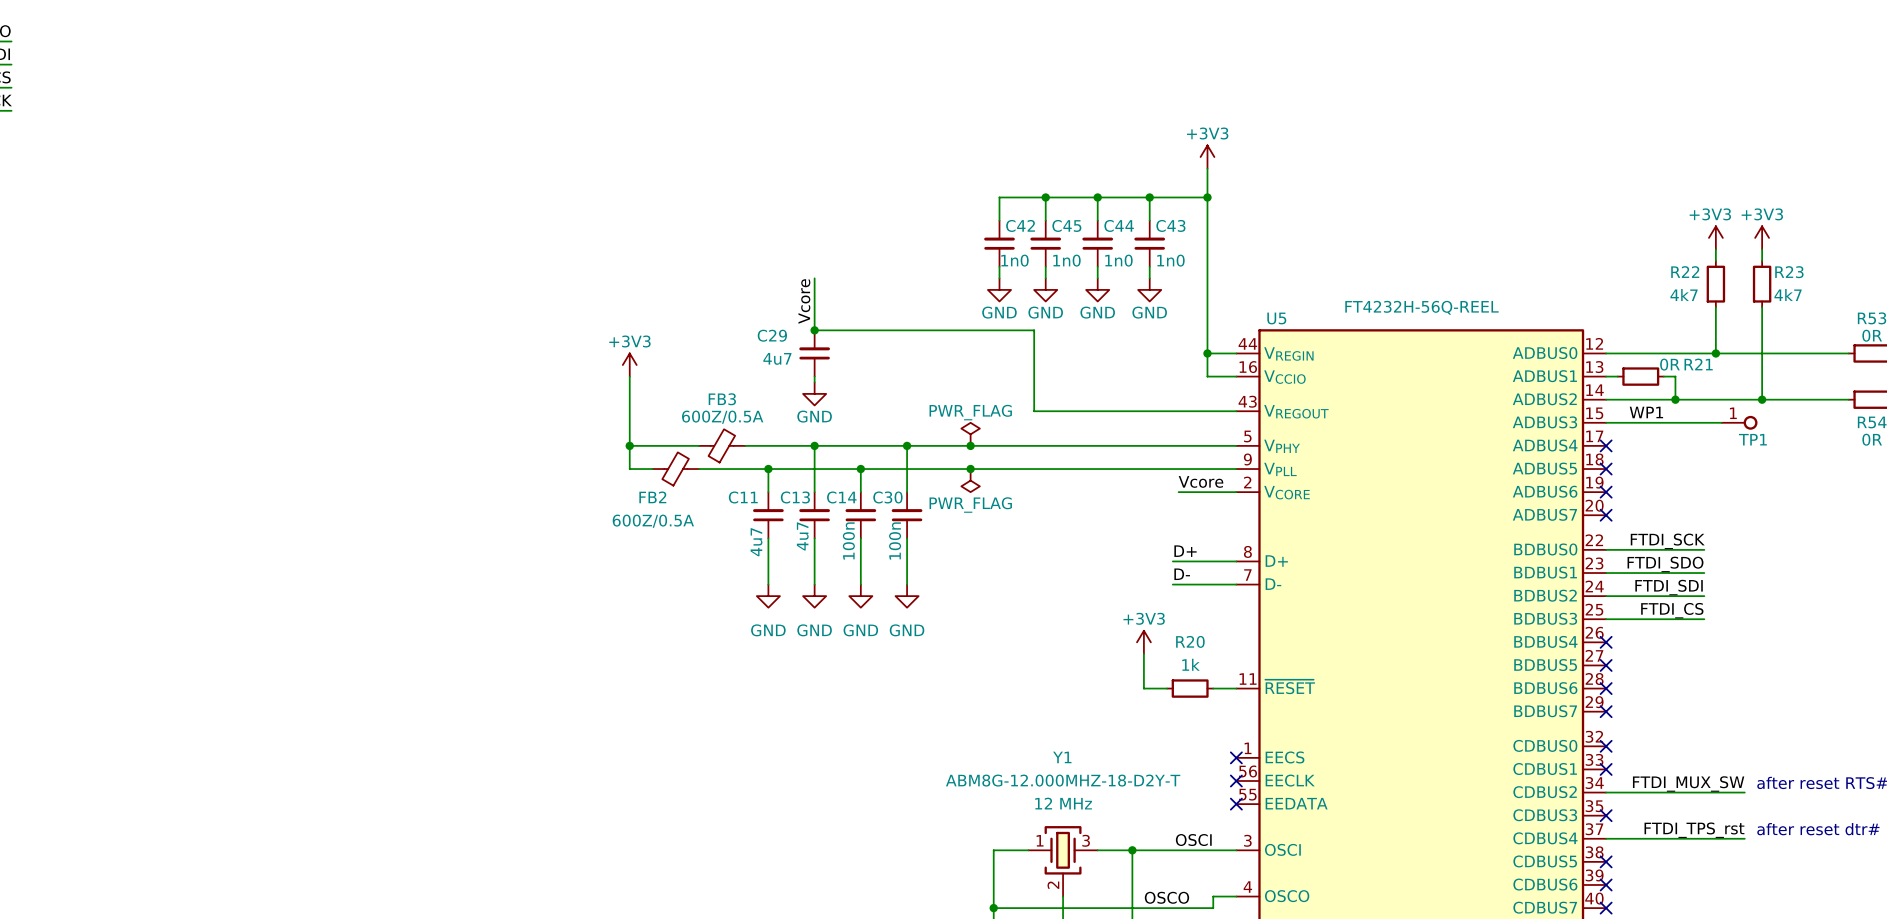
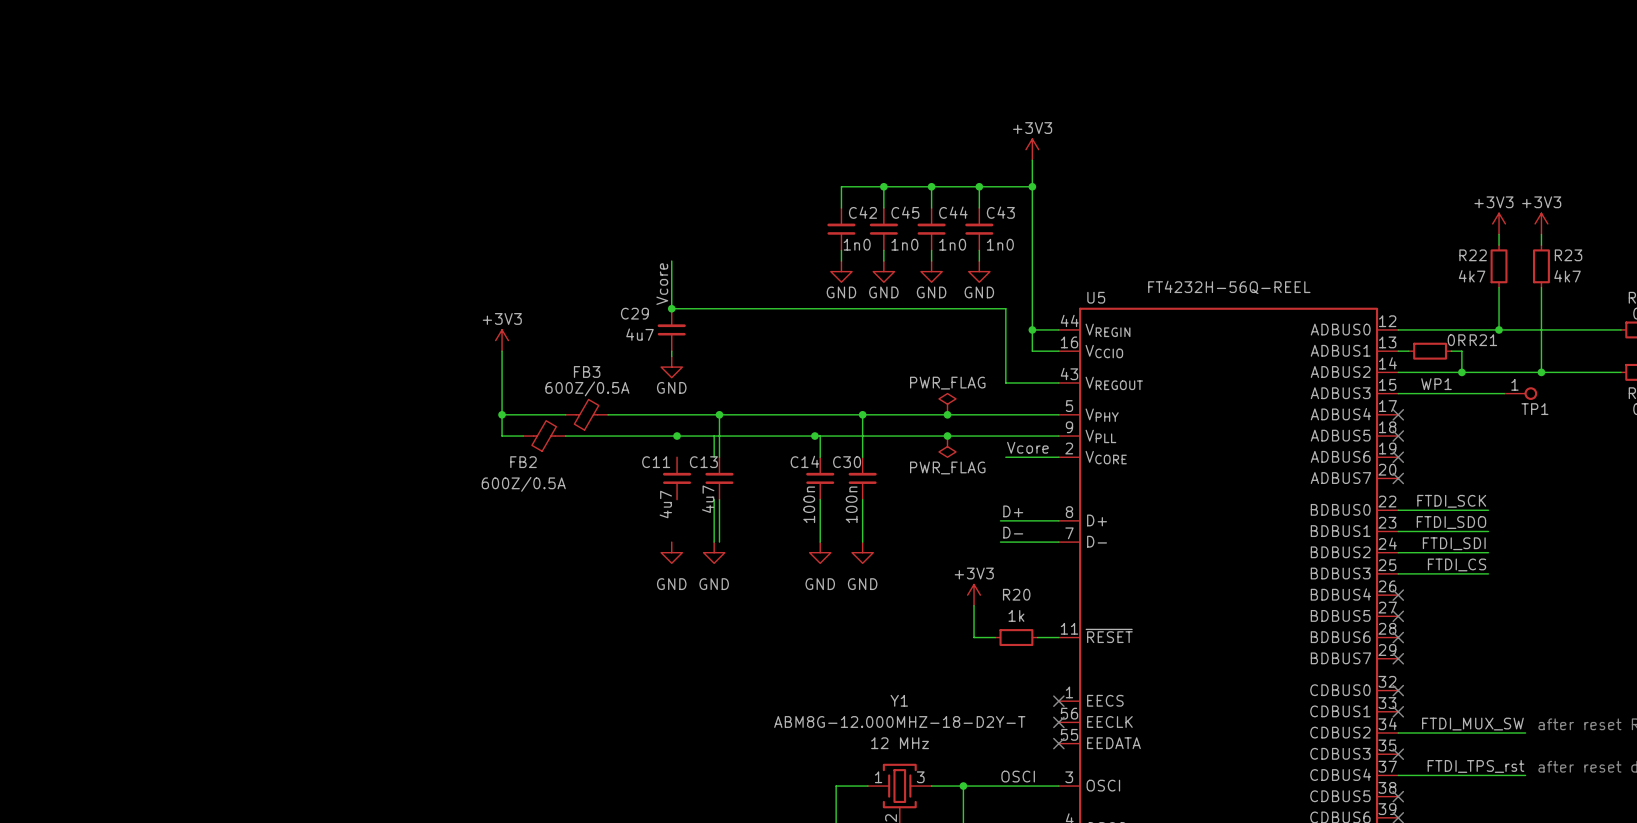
wire: (1034, 330) (1034, 411) (1178, 411) -> (873, 308) (1005, 308) (1005, 382)
power symbol: PWR_FLAG (970, 434) -> none
power symbol: none -> PWR_FLAG (947, 404)
wire: (814, 445) (814, 492) -> (862, 414) (862, 457)
junction: (814, 445) -> none
junction: none -> (719, 414)
wire: (907, 445) (907, 492) -> (719, 414) (719, 457)
junction: (907, 445) -> none
junction: (970, 445) -> none
junction: none -> (862, 414)
junction: none -> (947, 414)
wire: (768, 469) (768, 492) -> (820, 436) (820, 457)
junction: (768, 469) -> none
junction: none -> (677, 436)
junction: (860, 469) -> none
junction: none -> (947, 436)
power symbol: PWR_FLAG (970, 480) -> none
power symbol: none -> PWR_FLAG (947, 446)
C11 position: (768, 515) -> (677, 478)
C13 position: (814, 515) -> (719, 478)
C14 position: (860, 515) -> (820, 478)
C30 position: (907, 515) -> (862, 478)
wire: (768, 538) (768, 584) -> (820, 499) (820, 542)
wire: (814, 538) (814, 584) -> (862, 499) (862, 542)
wire: (907, 538) (907, 584) -> (719, 499) (719, 542)
power symbol: GND (768, 596) -> none
power symbol: GND (907, 596) -> none
power symbol: none -> GND (820, 552)
power symbol: none -> GND (862, 552)

